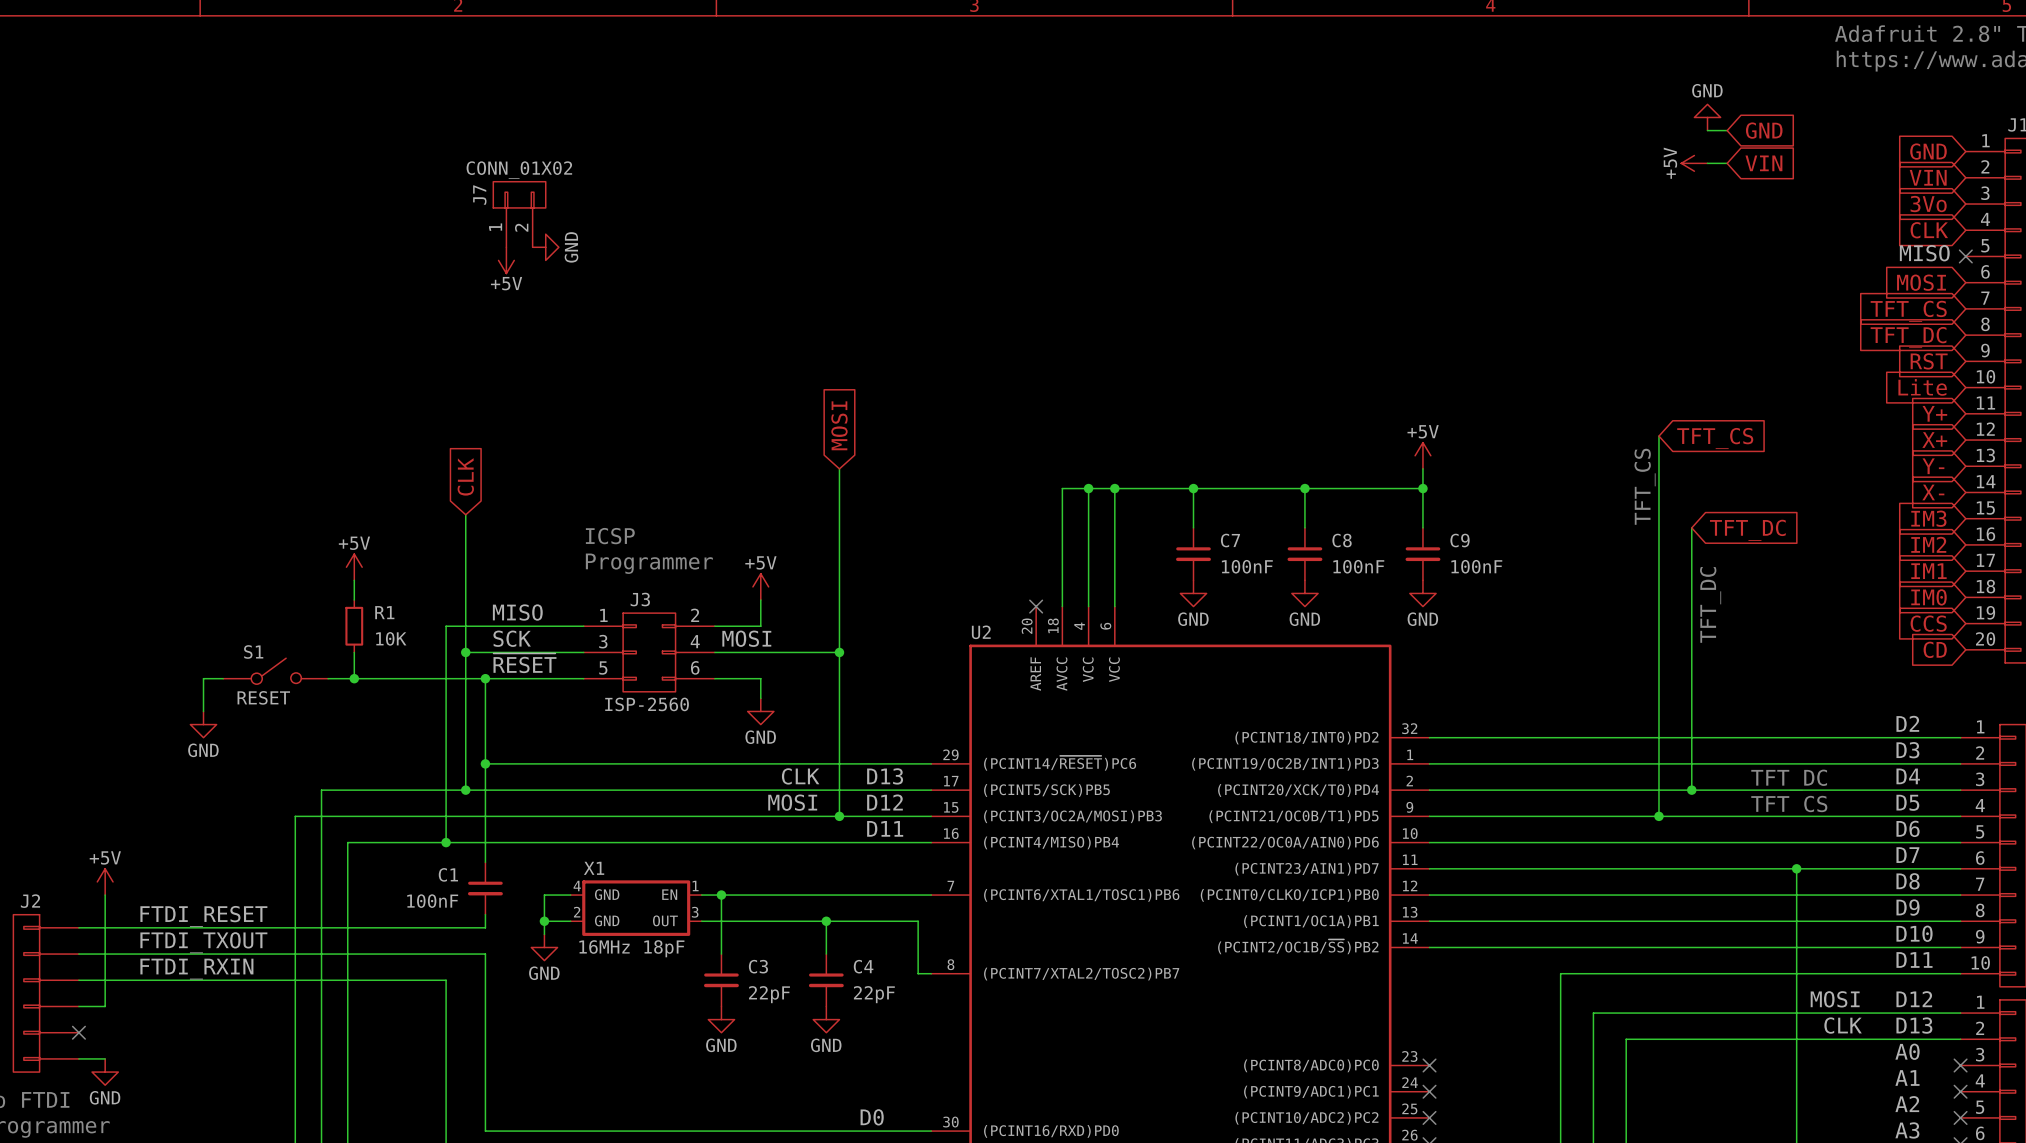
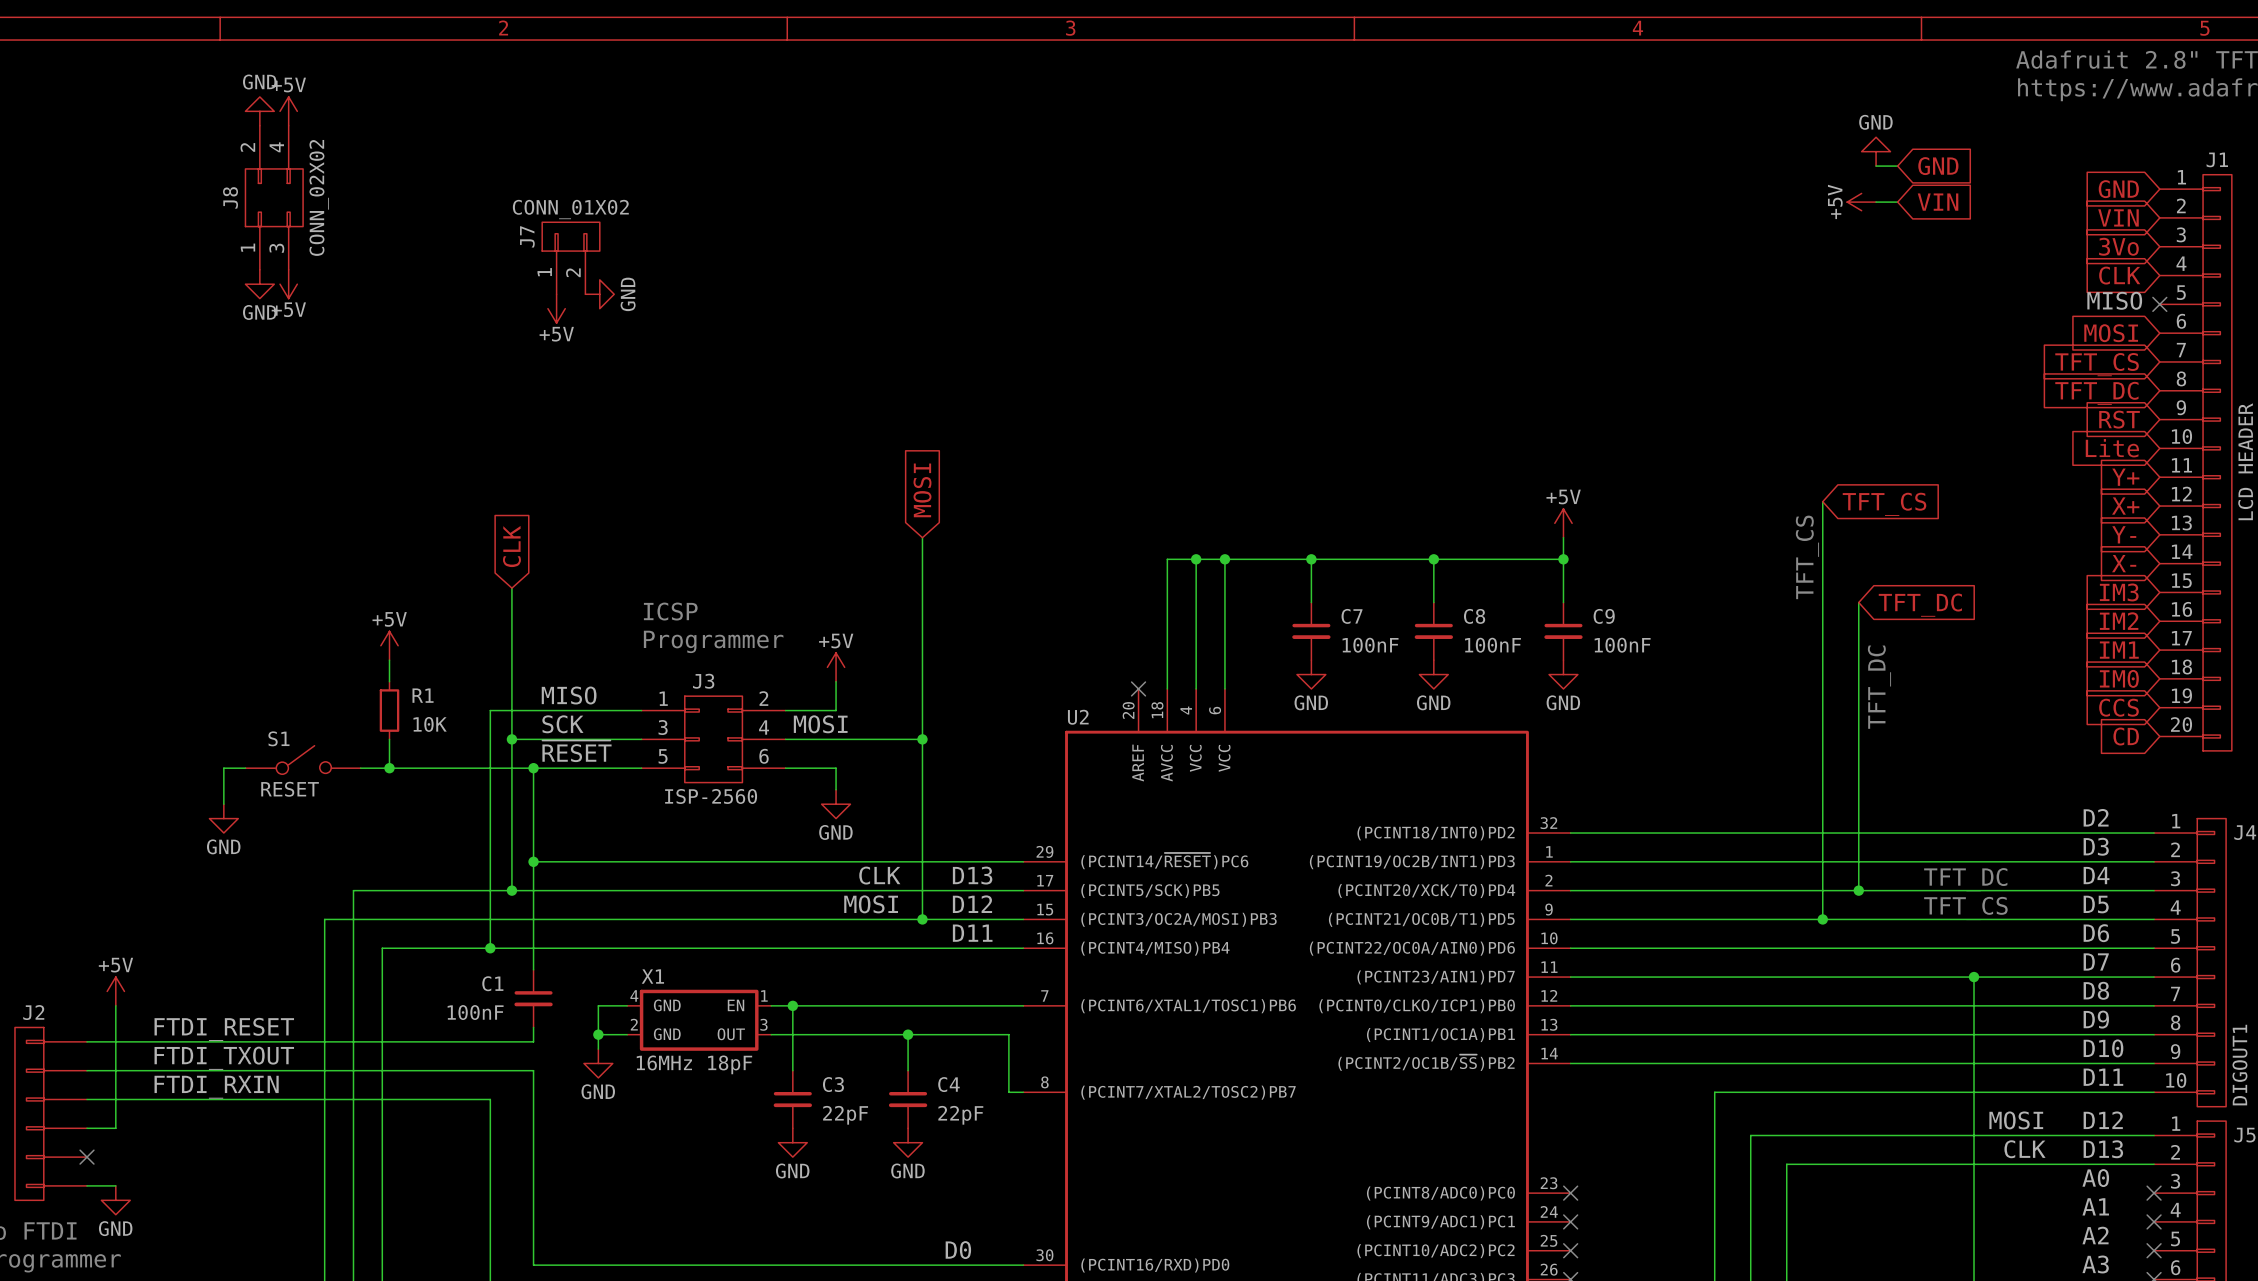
power symbol: none -> GND (259, 111)
power symbol: none -> +5V (288, 111)
J8: none -> CONN_02X02 (274, 197)
power symbol: none -> GND (259, 284)
power symbol: none -> +5V (288, 284)

